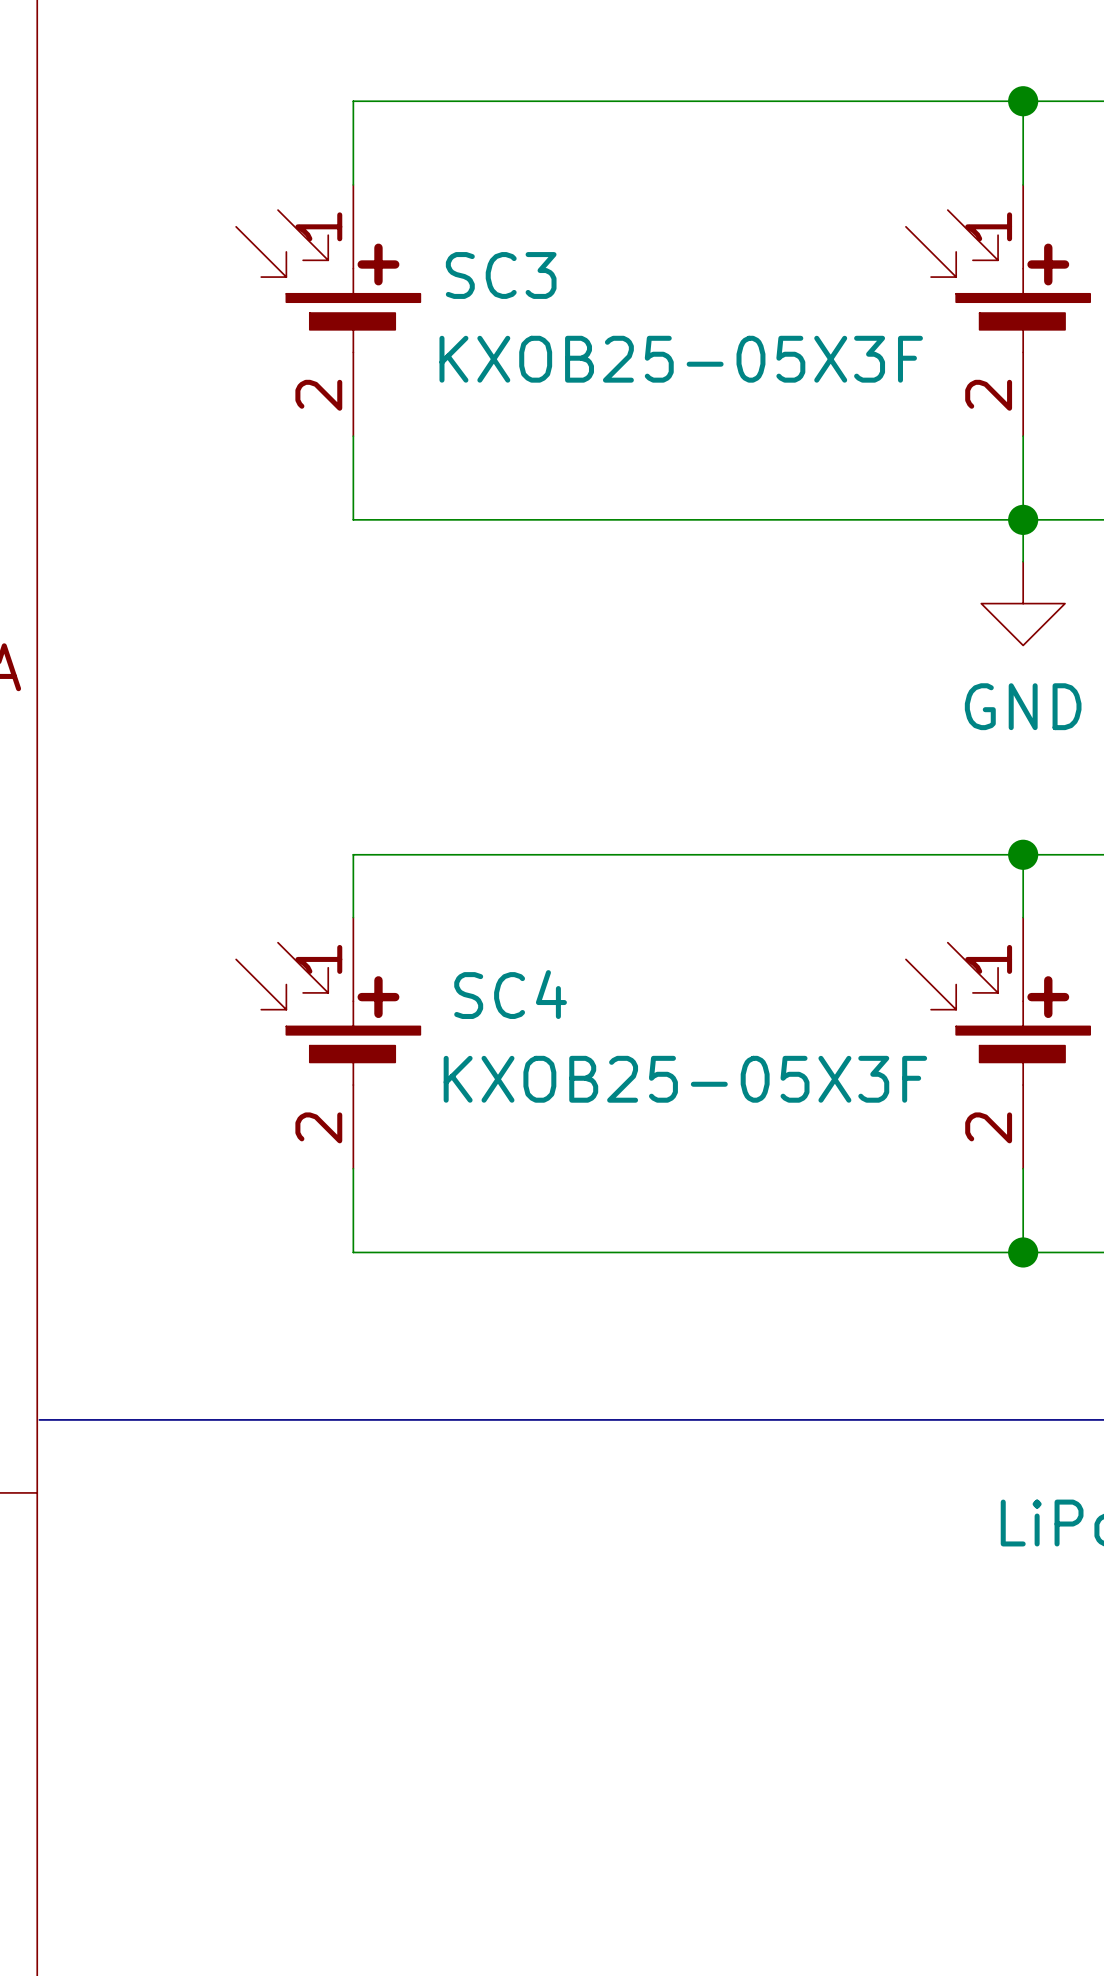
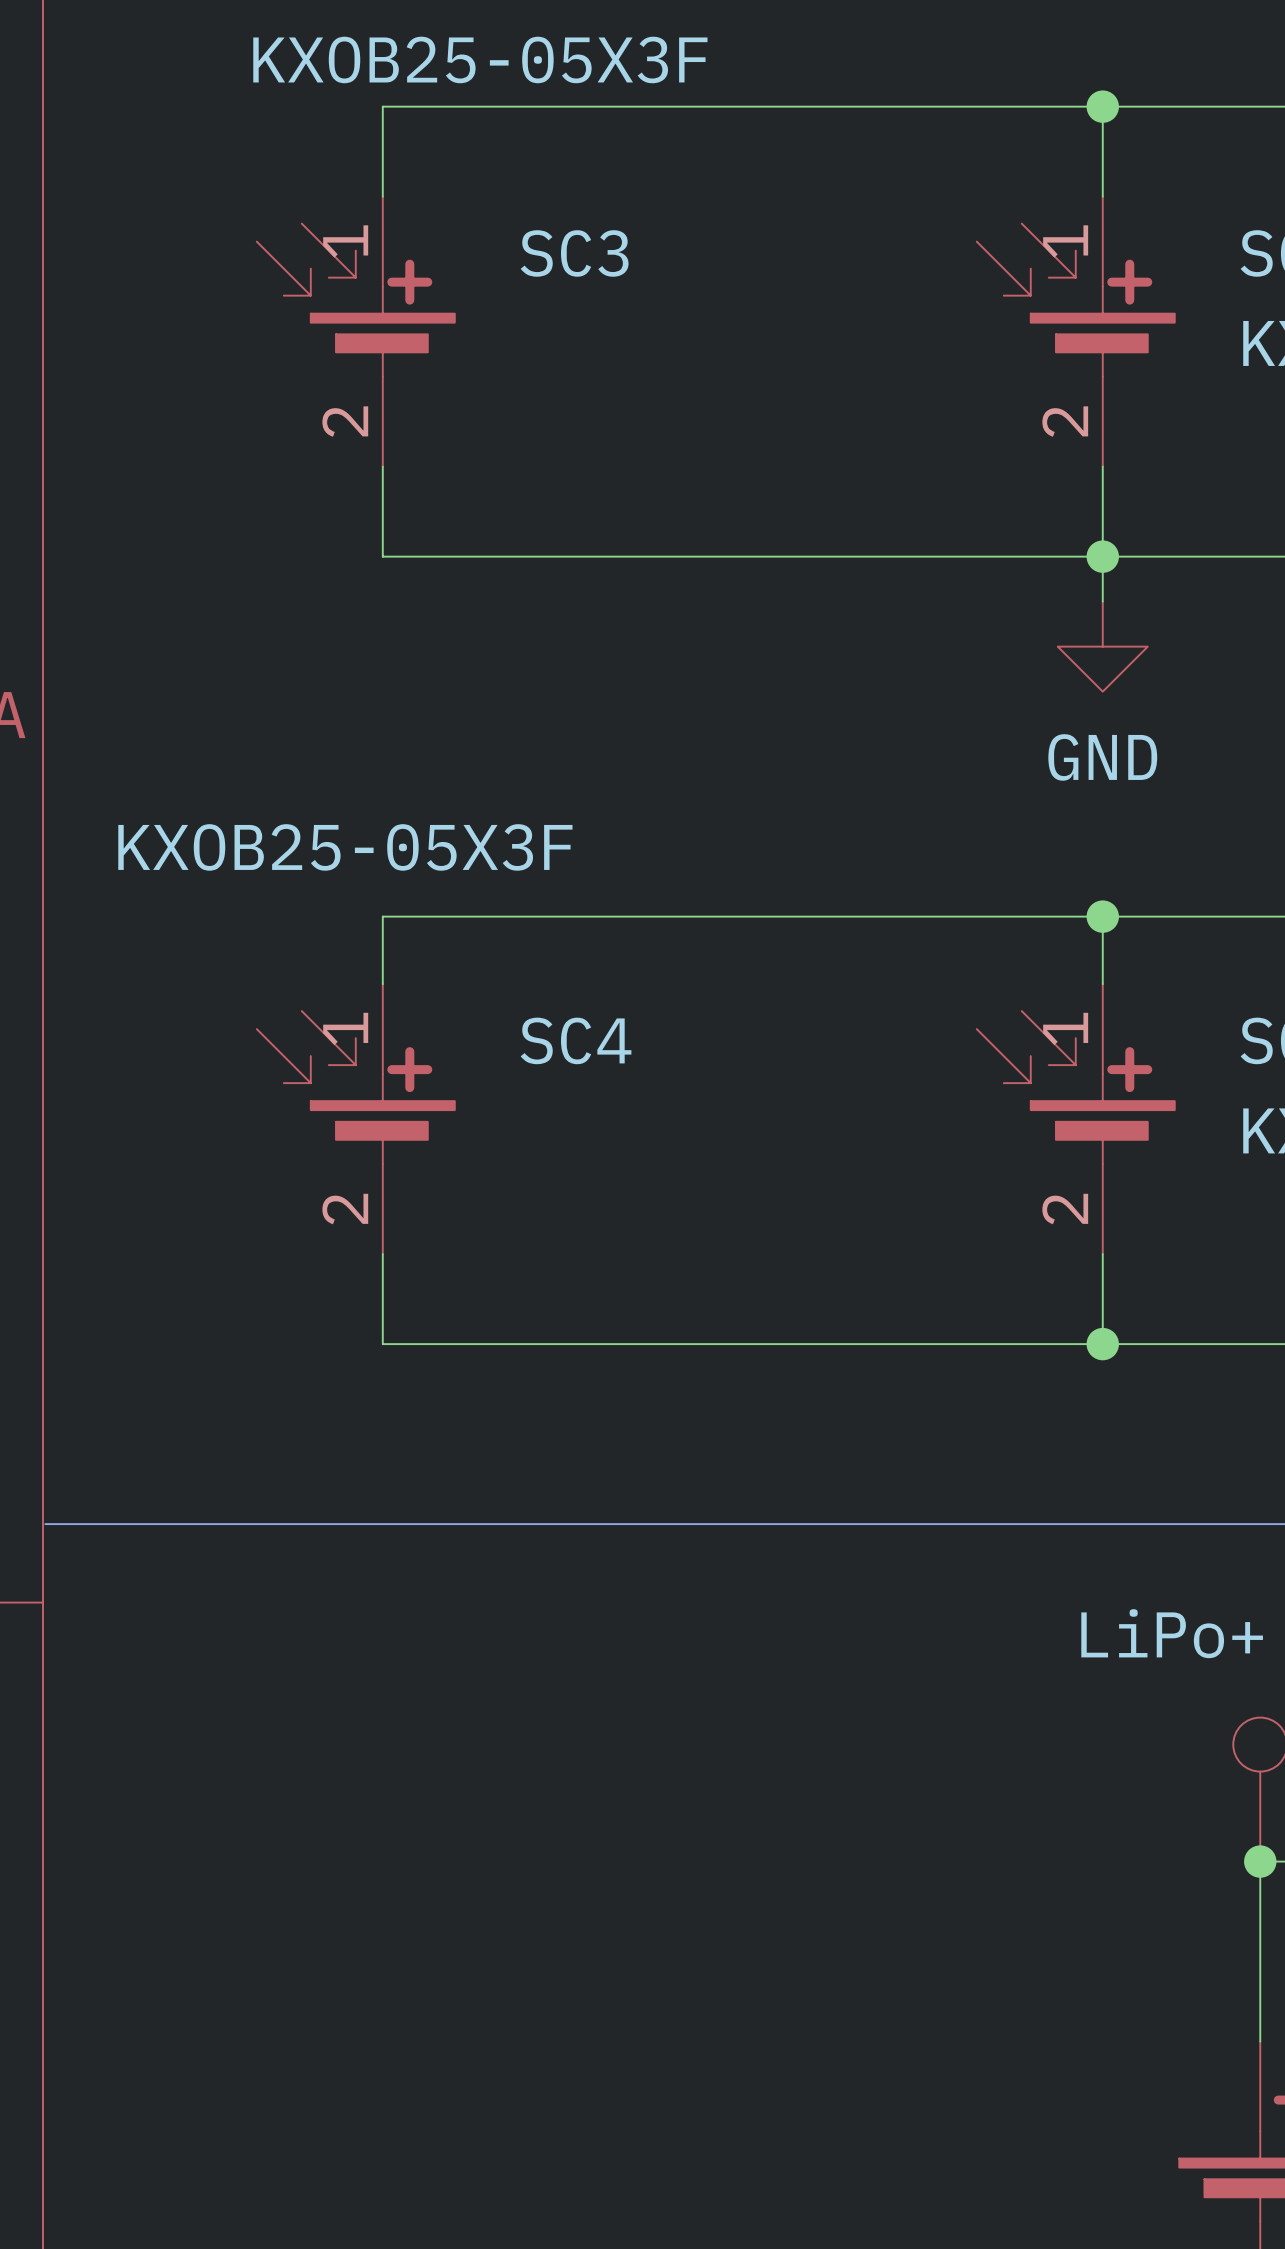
SC3 name position: SC3 (501, 275) -> SC3 (574, 253)
SC3 value position: KXOB25-05X3F (681, 359) -> KXOB25-05X3F (480, 59)
SC4 name position: SC4 (510, 994) -> SC4 (576, 1040)
SC4 value position: KXOB25-05X3F (685, 1079) -> KXOB25-05X3F (345, 847)

